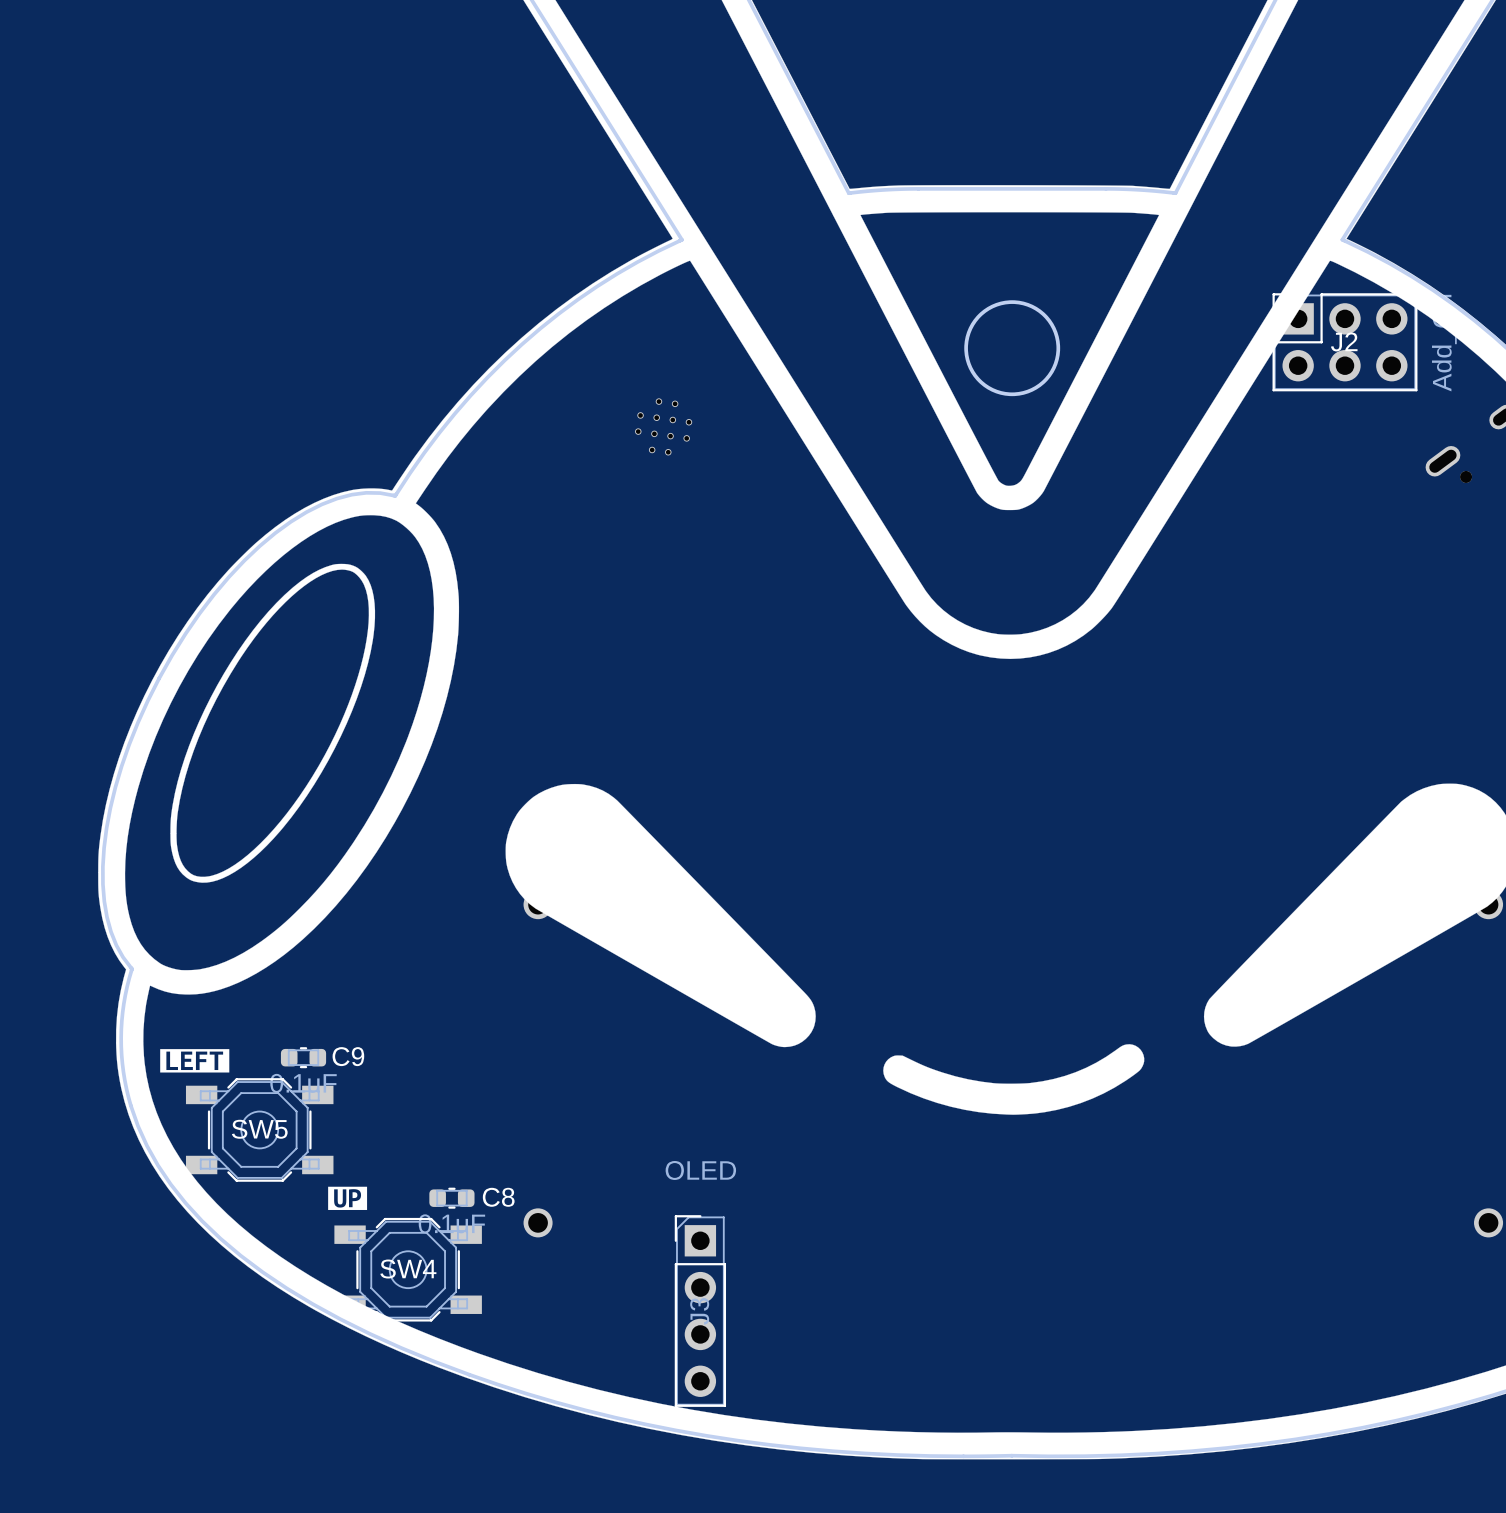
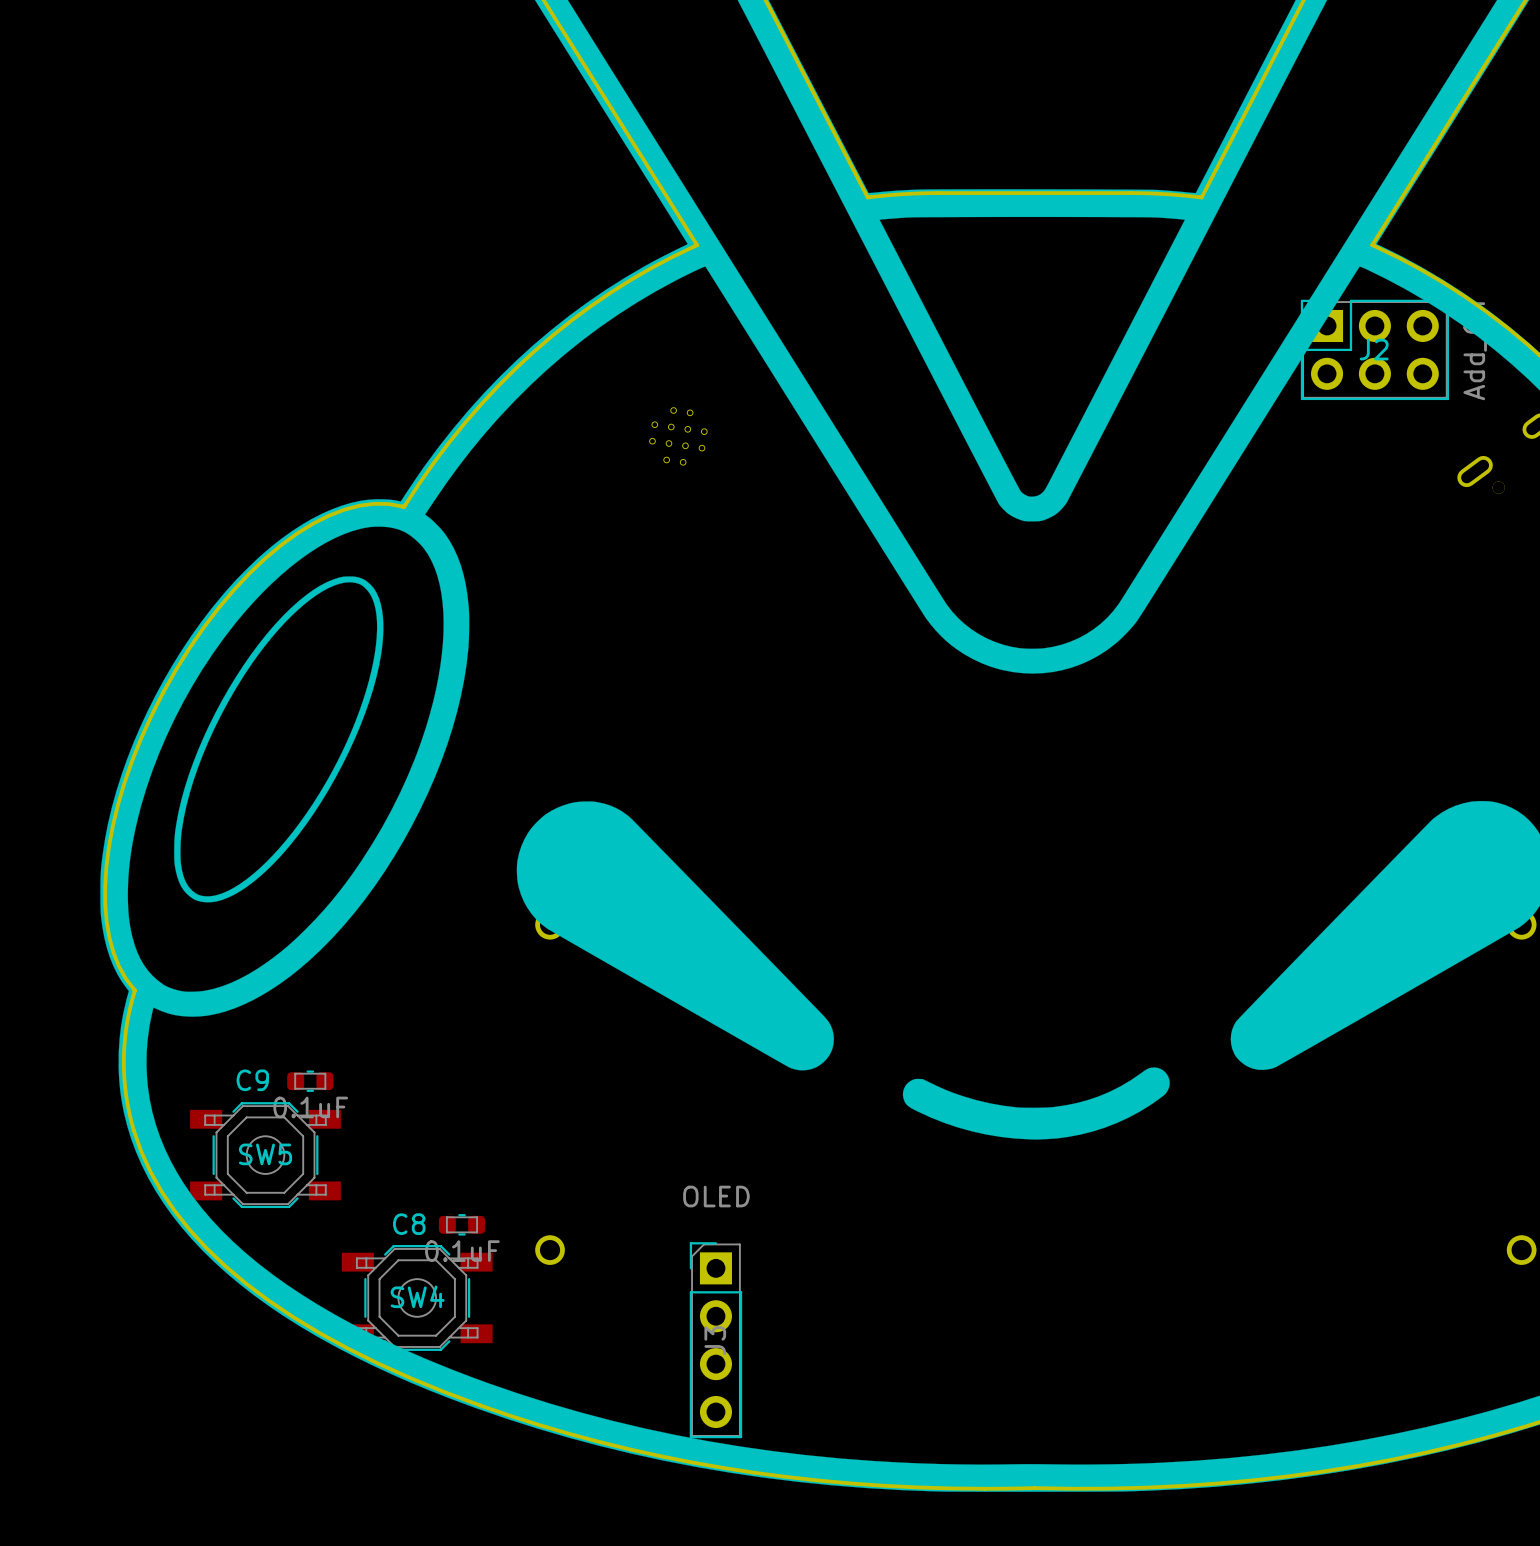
round board edge: [964, 300, 1061, 397] -> none
drawing: [160, 1049, 230, 1073] -> none
C9 name position: C9 (348, 1056) -> C9 (252, 1080)
drawing: [328, 1186, 368, 1210] -> none
C8 name position: C8 (498, 1197) -> C8 (409, 1224)

